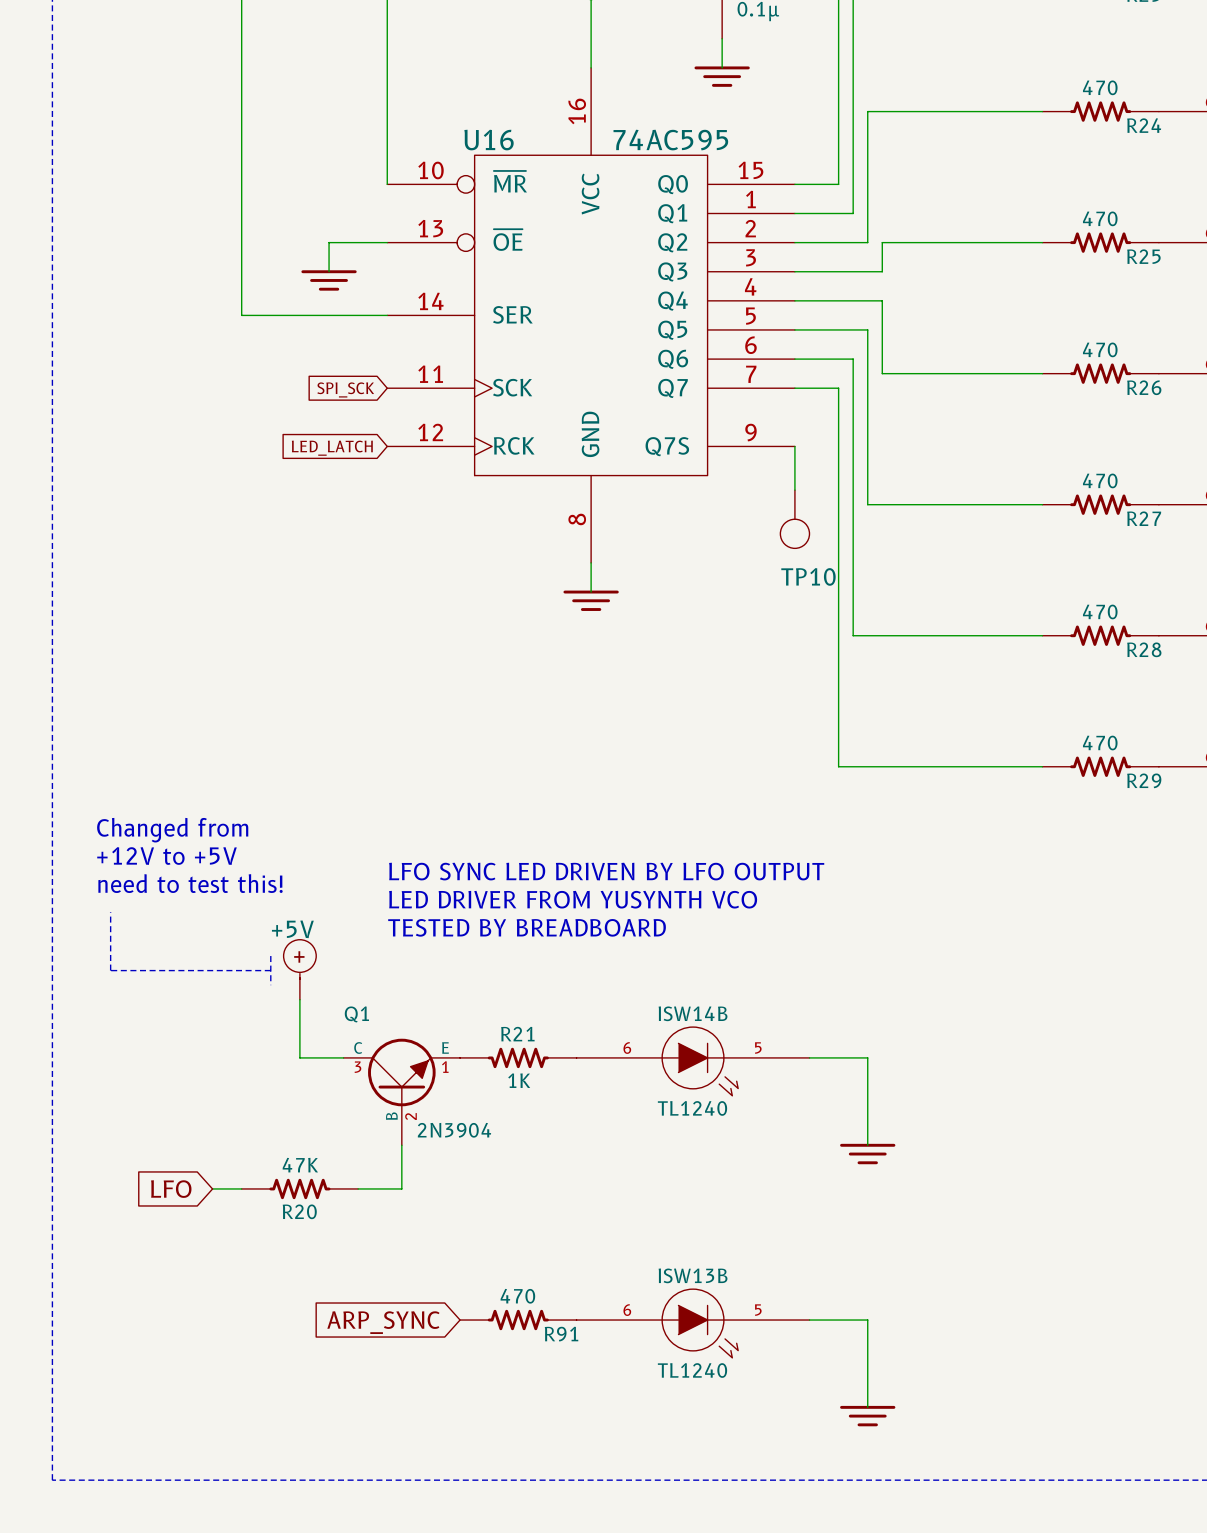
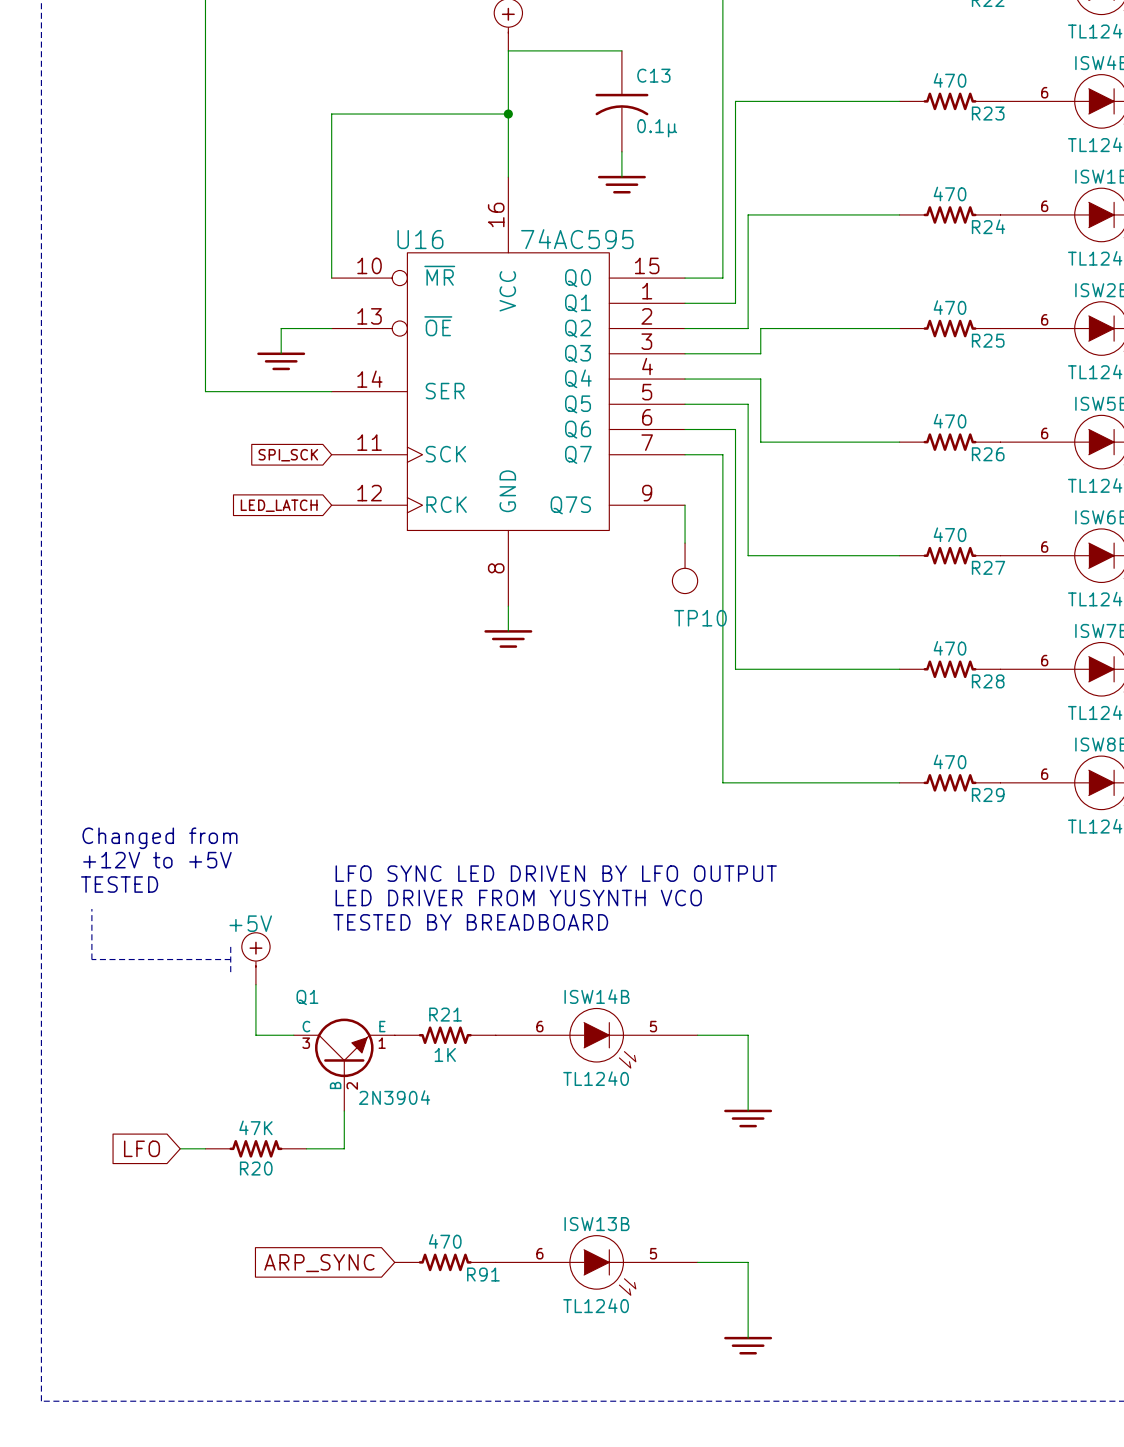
text: need to test this! (190, 883) -> TESTED (119, 884)

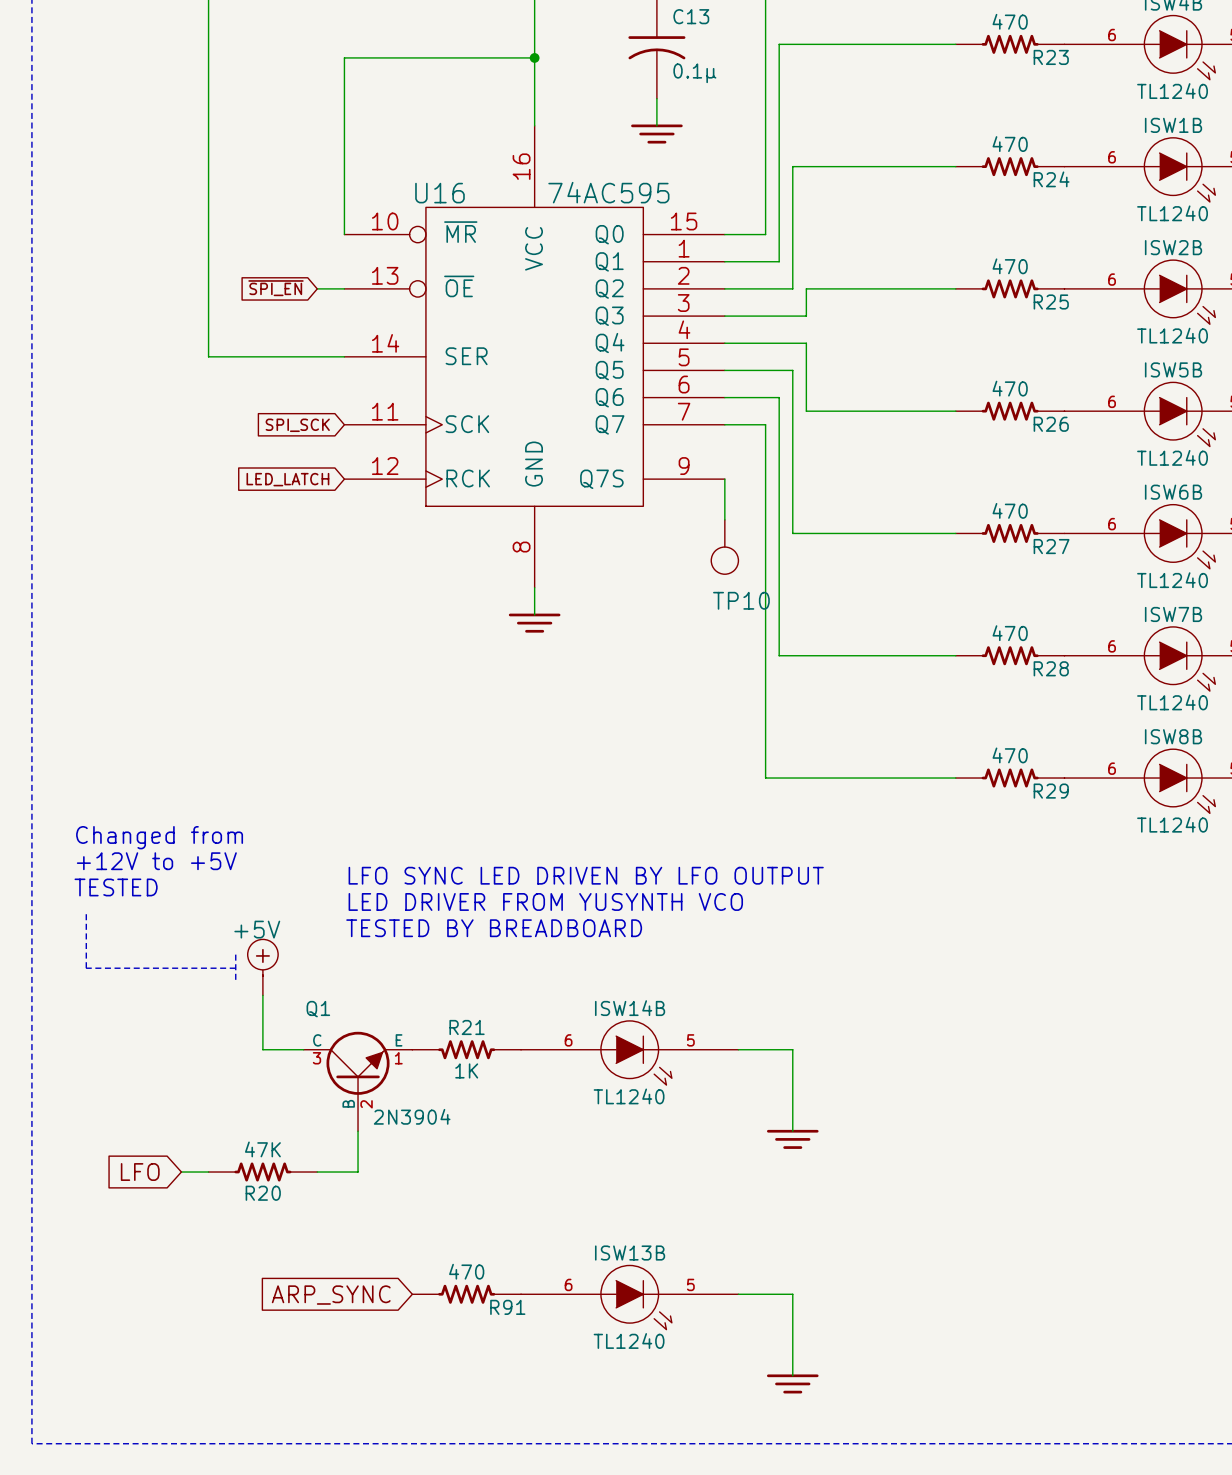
global label: none -> ~{SPI_EN} (276, 288)
wire: (306, 328) (281, 328) (281, 353) -> none
power symbol: (281, 361) -> none

